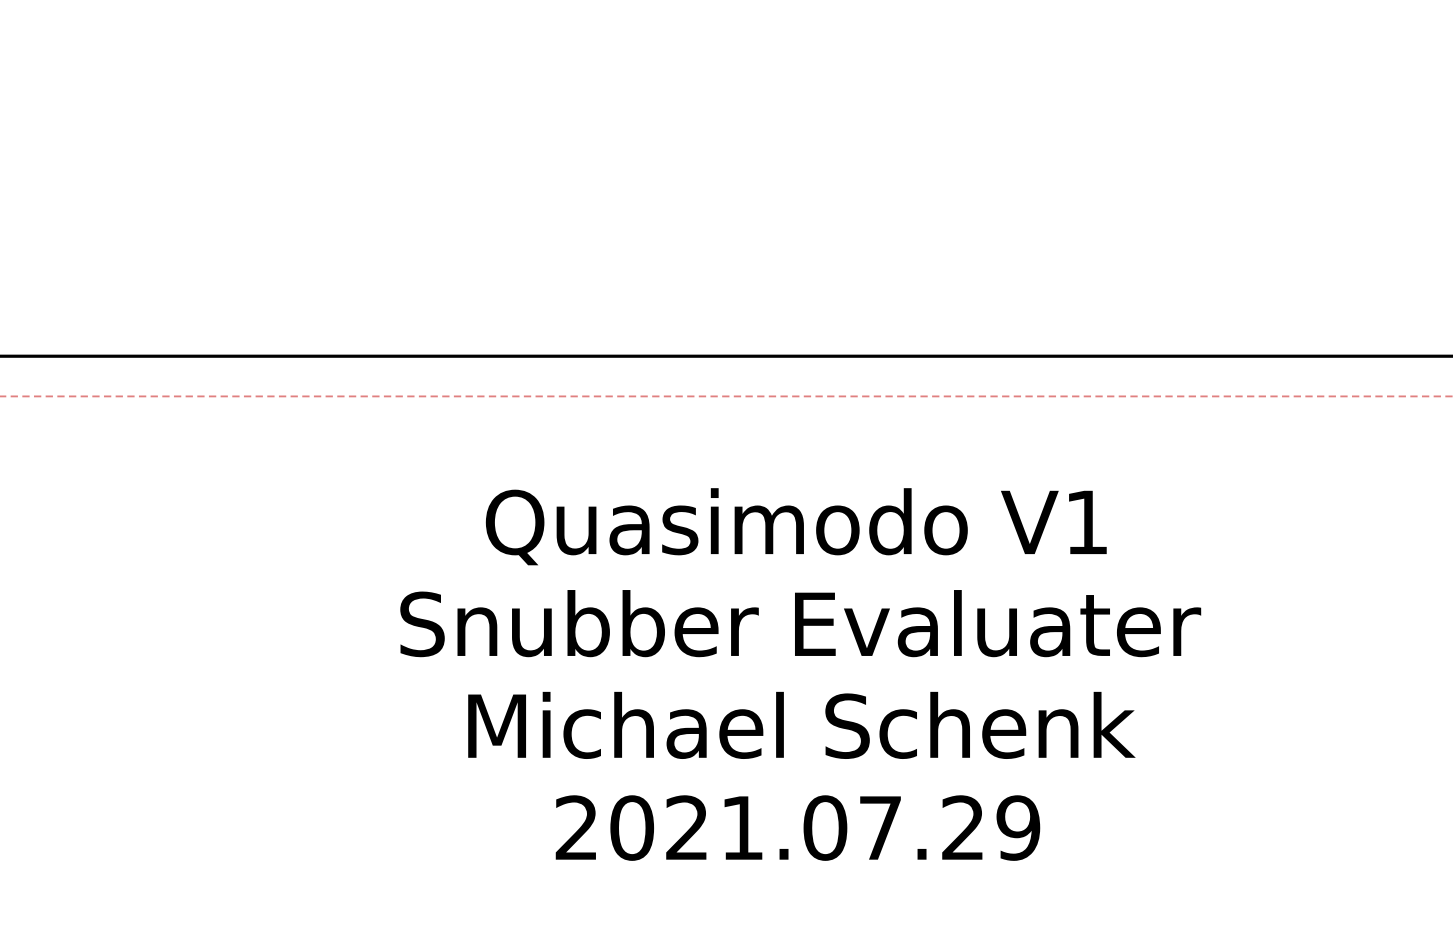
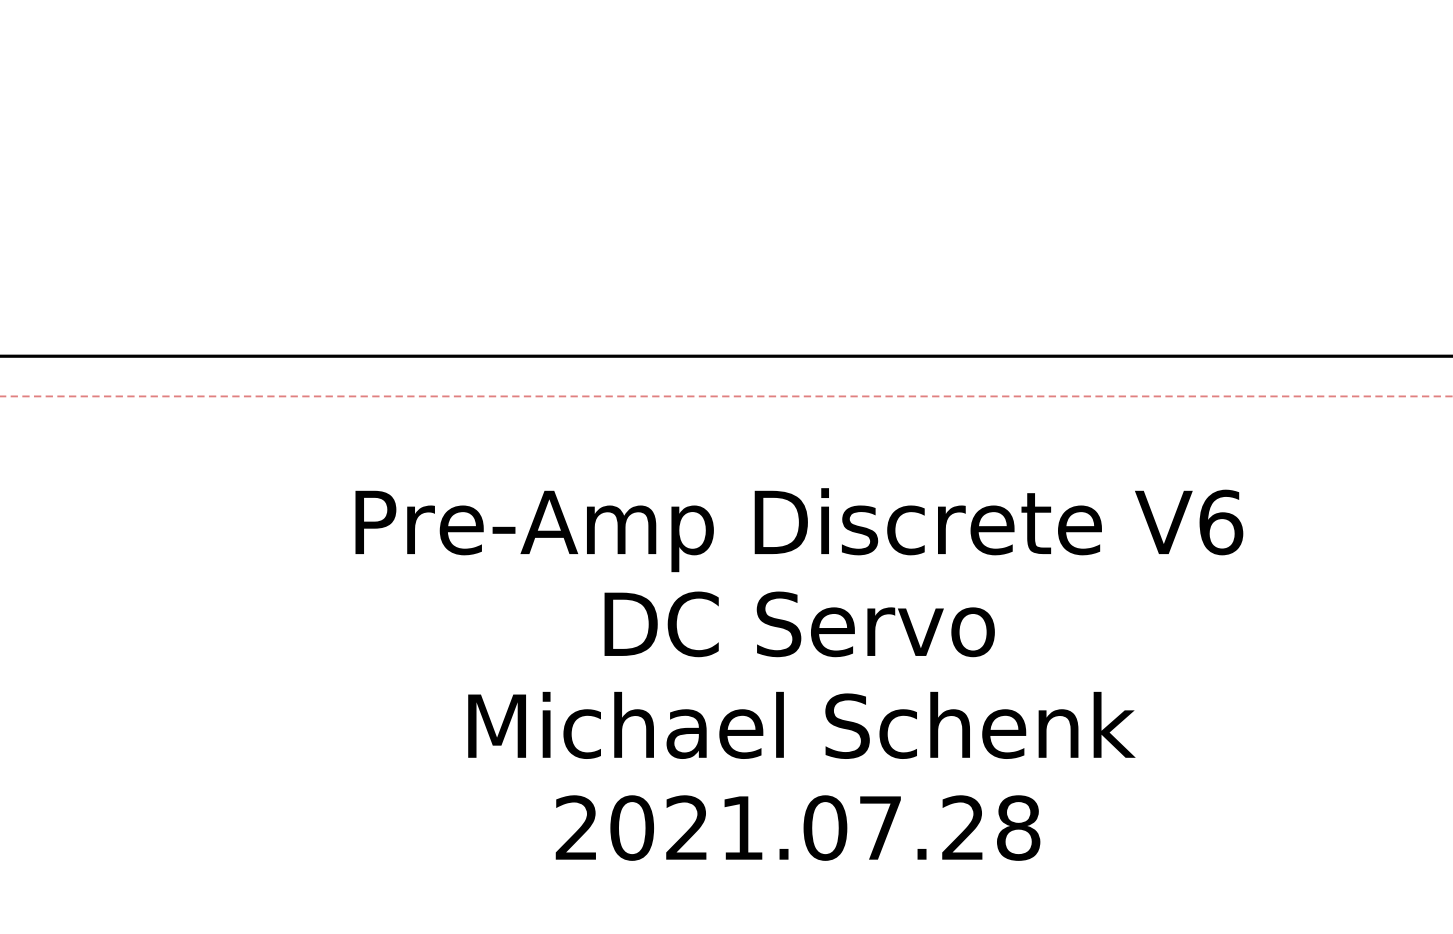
text: Quasimodo V1 (796, 526) -> Pre-Amp Discrete V6 (799, 530)
text: Snubber Evaluater (800, 623) -> DC Servo (799, 624)
text: 2021.07.29 (798, 828) -> 2021.07.28 (798, 828)

